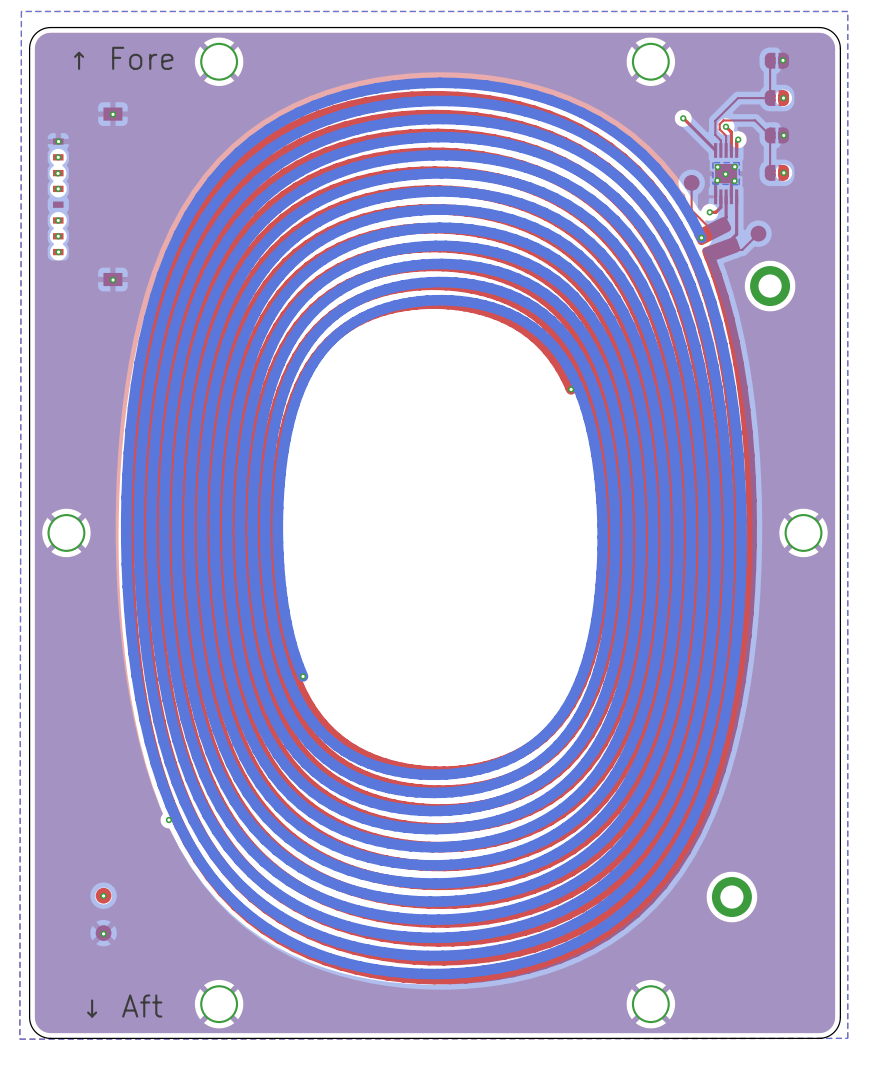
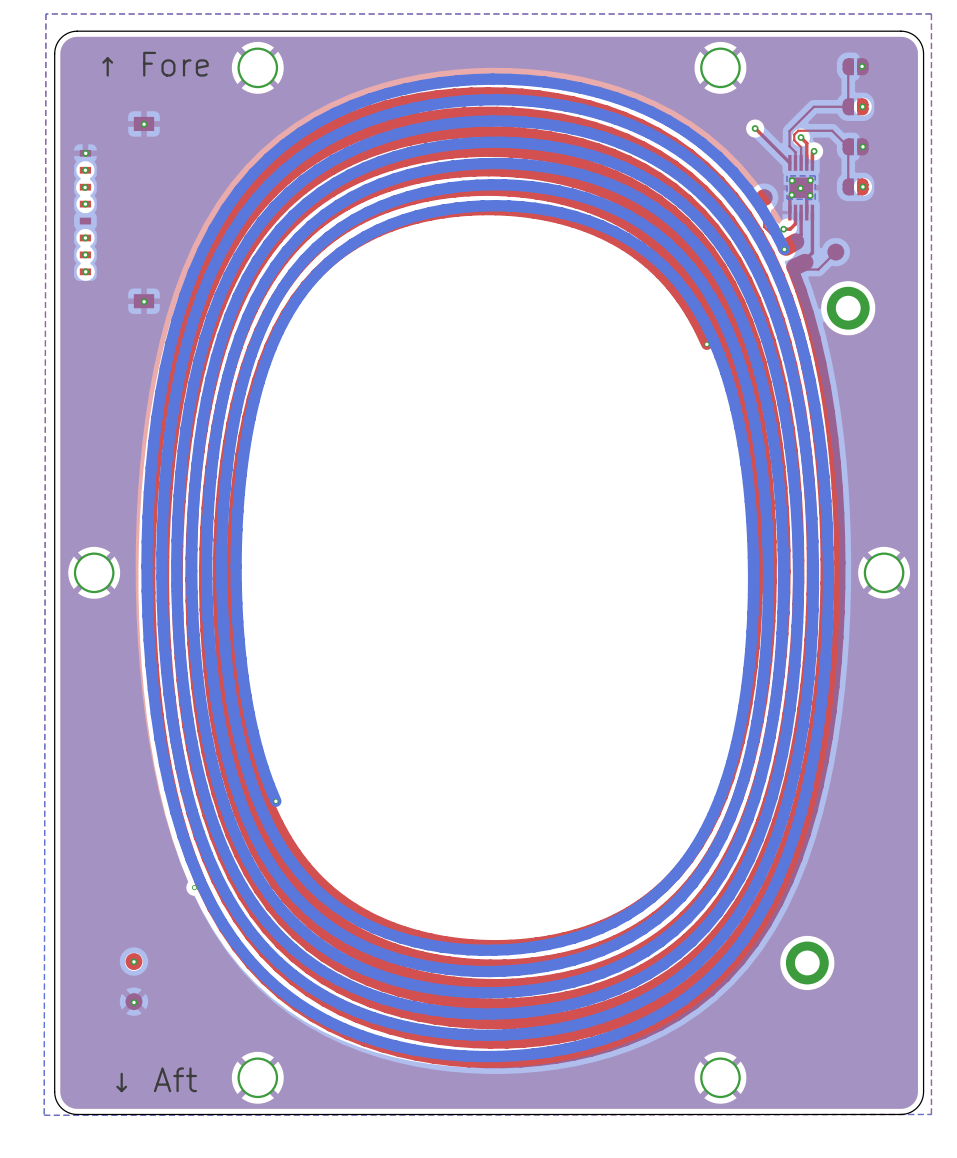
part footprint: [120, 77, 757, 985] -> [141, 73, 846, 1069]

